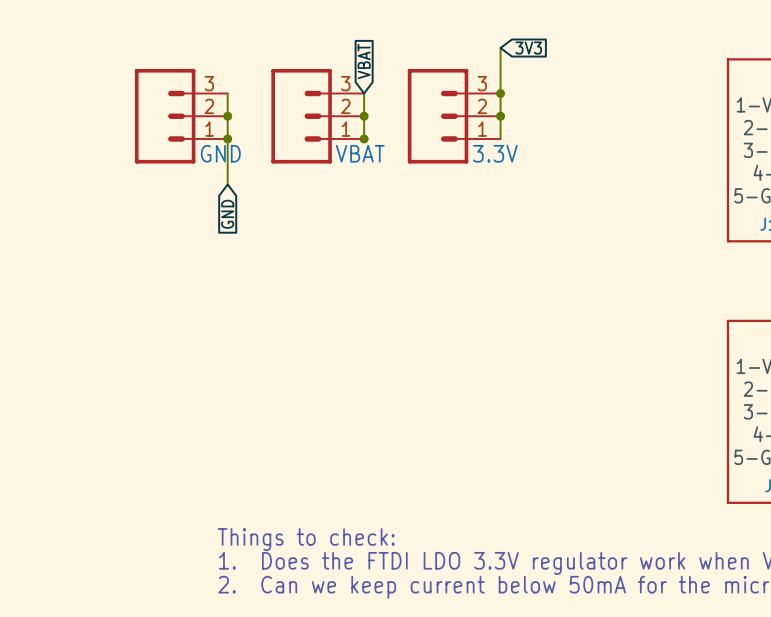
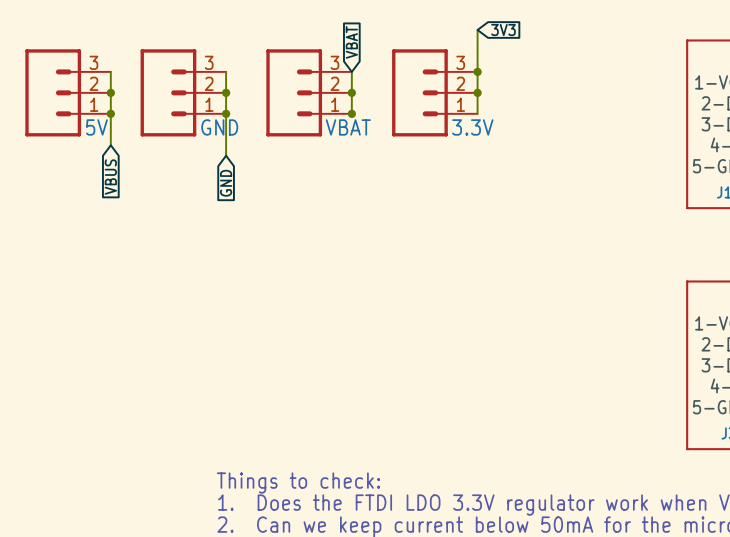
wire: none -> (110, 71) (110, 145)
5V: none -> (68, 92)
junction: none -> (110, 92)
junction: none -> (110, 113)
global label: none -> VBUS (110, 177)

